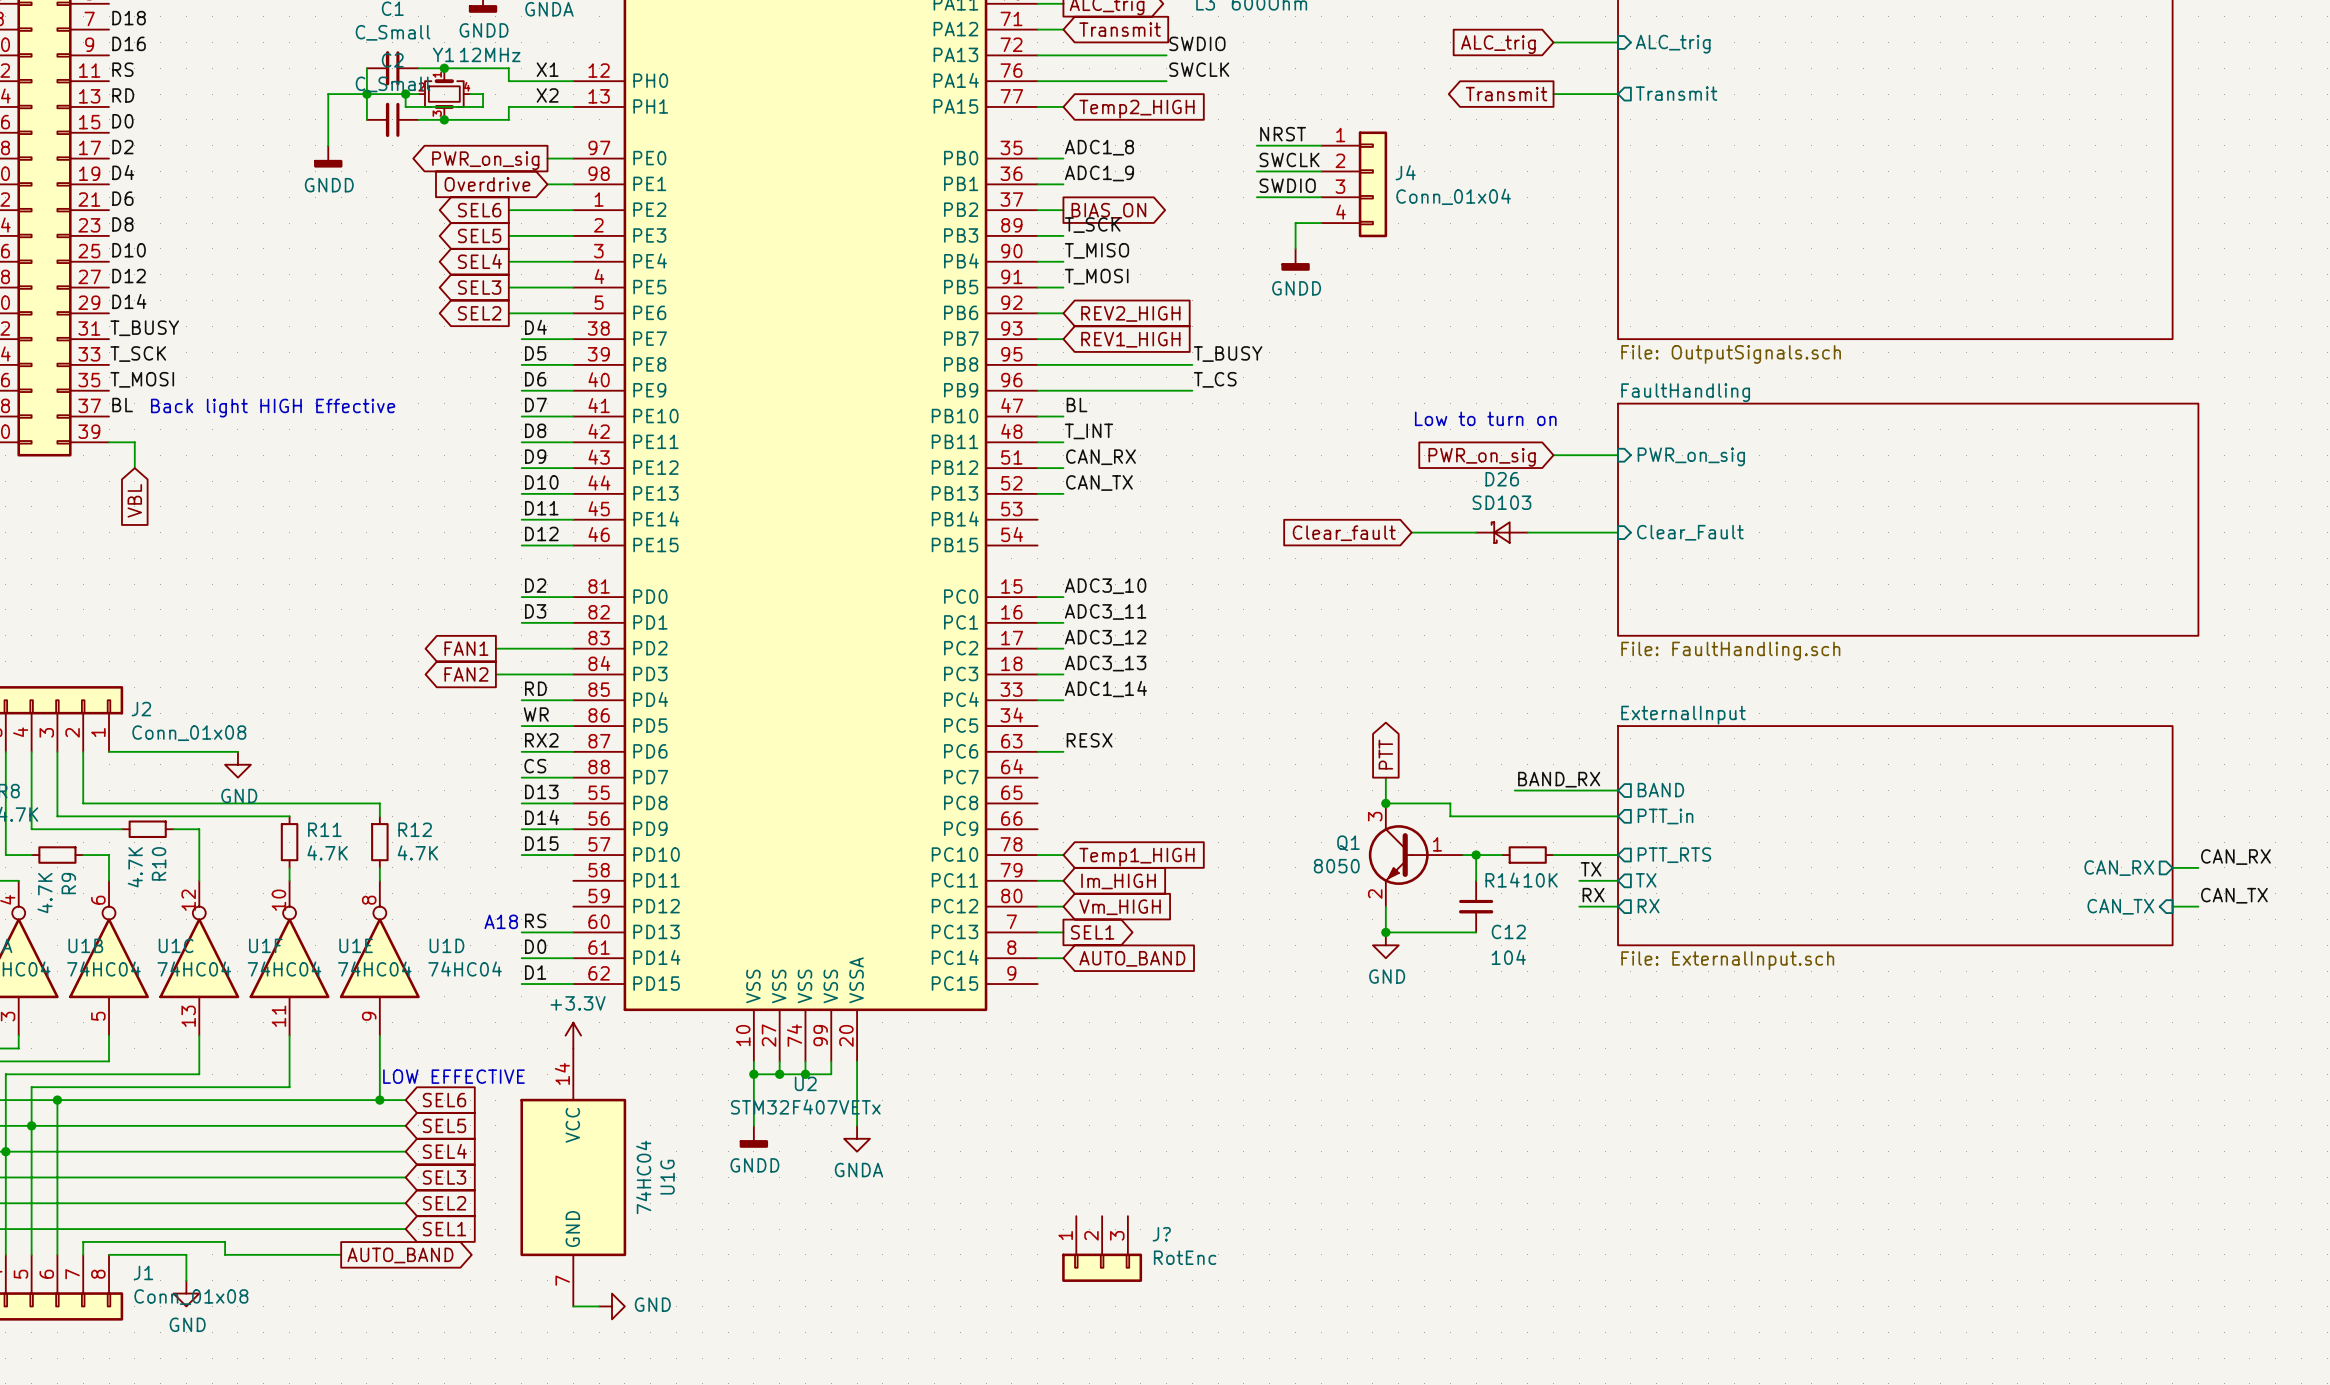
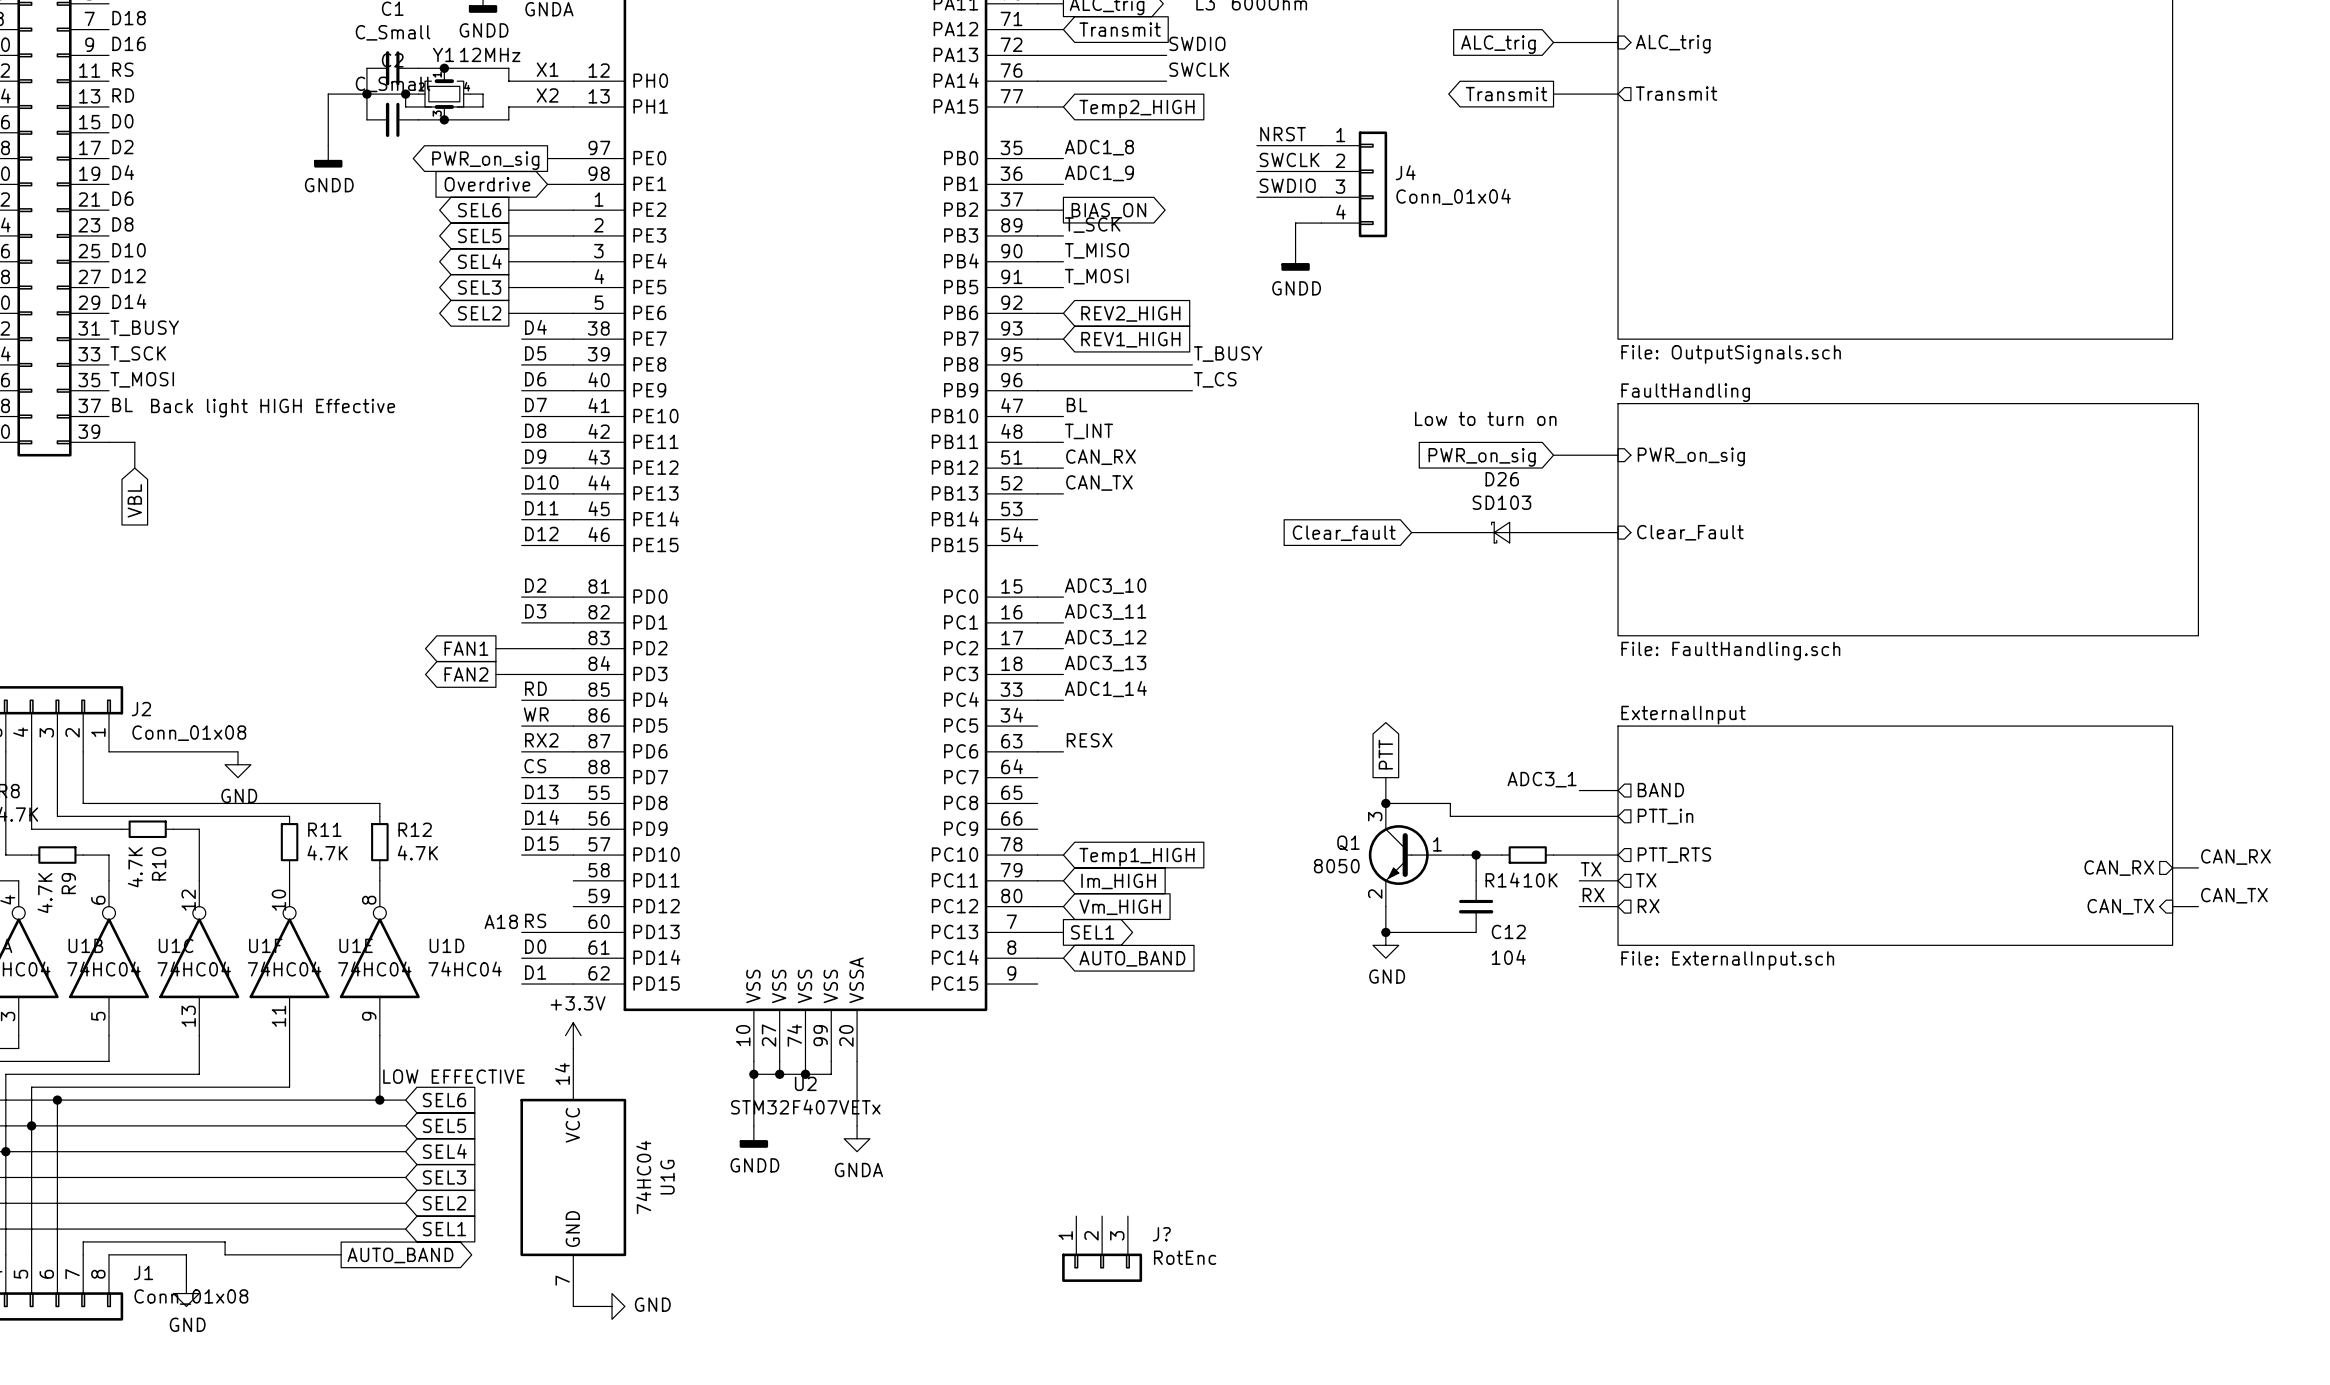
label: none -> ADC3_1 (1542, 779)
label: BAND_RX (1559, 779) -> none
wire: (1514, 790) (1579, 790) -> none

